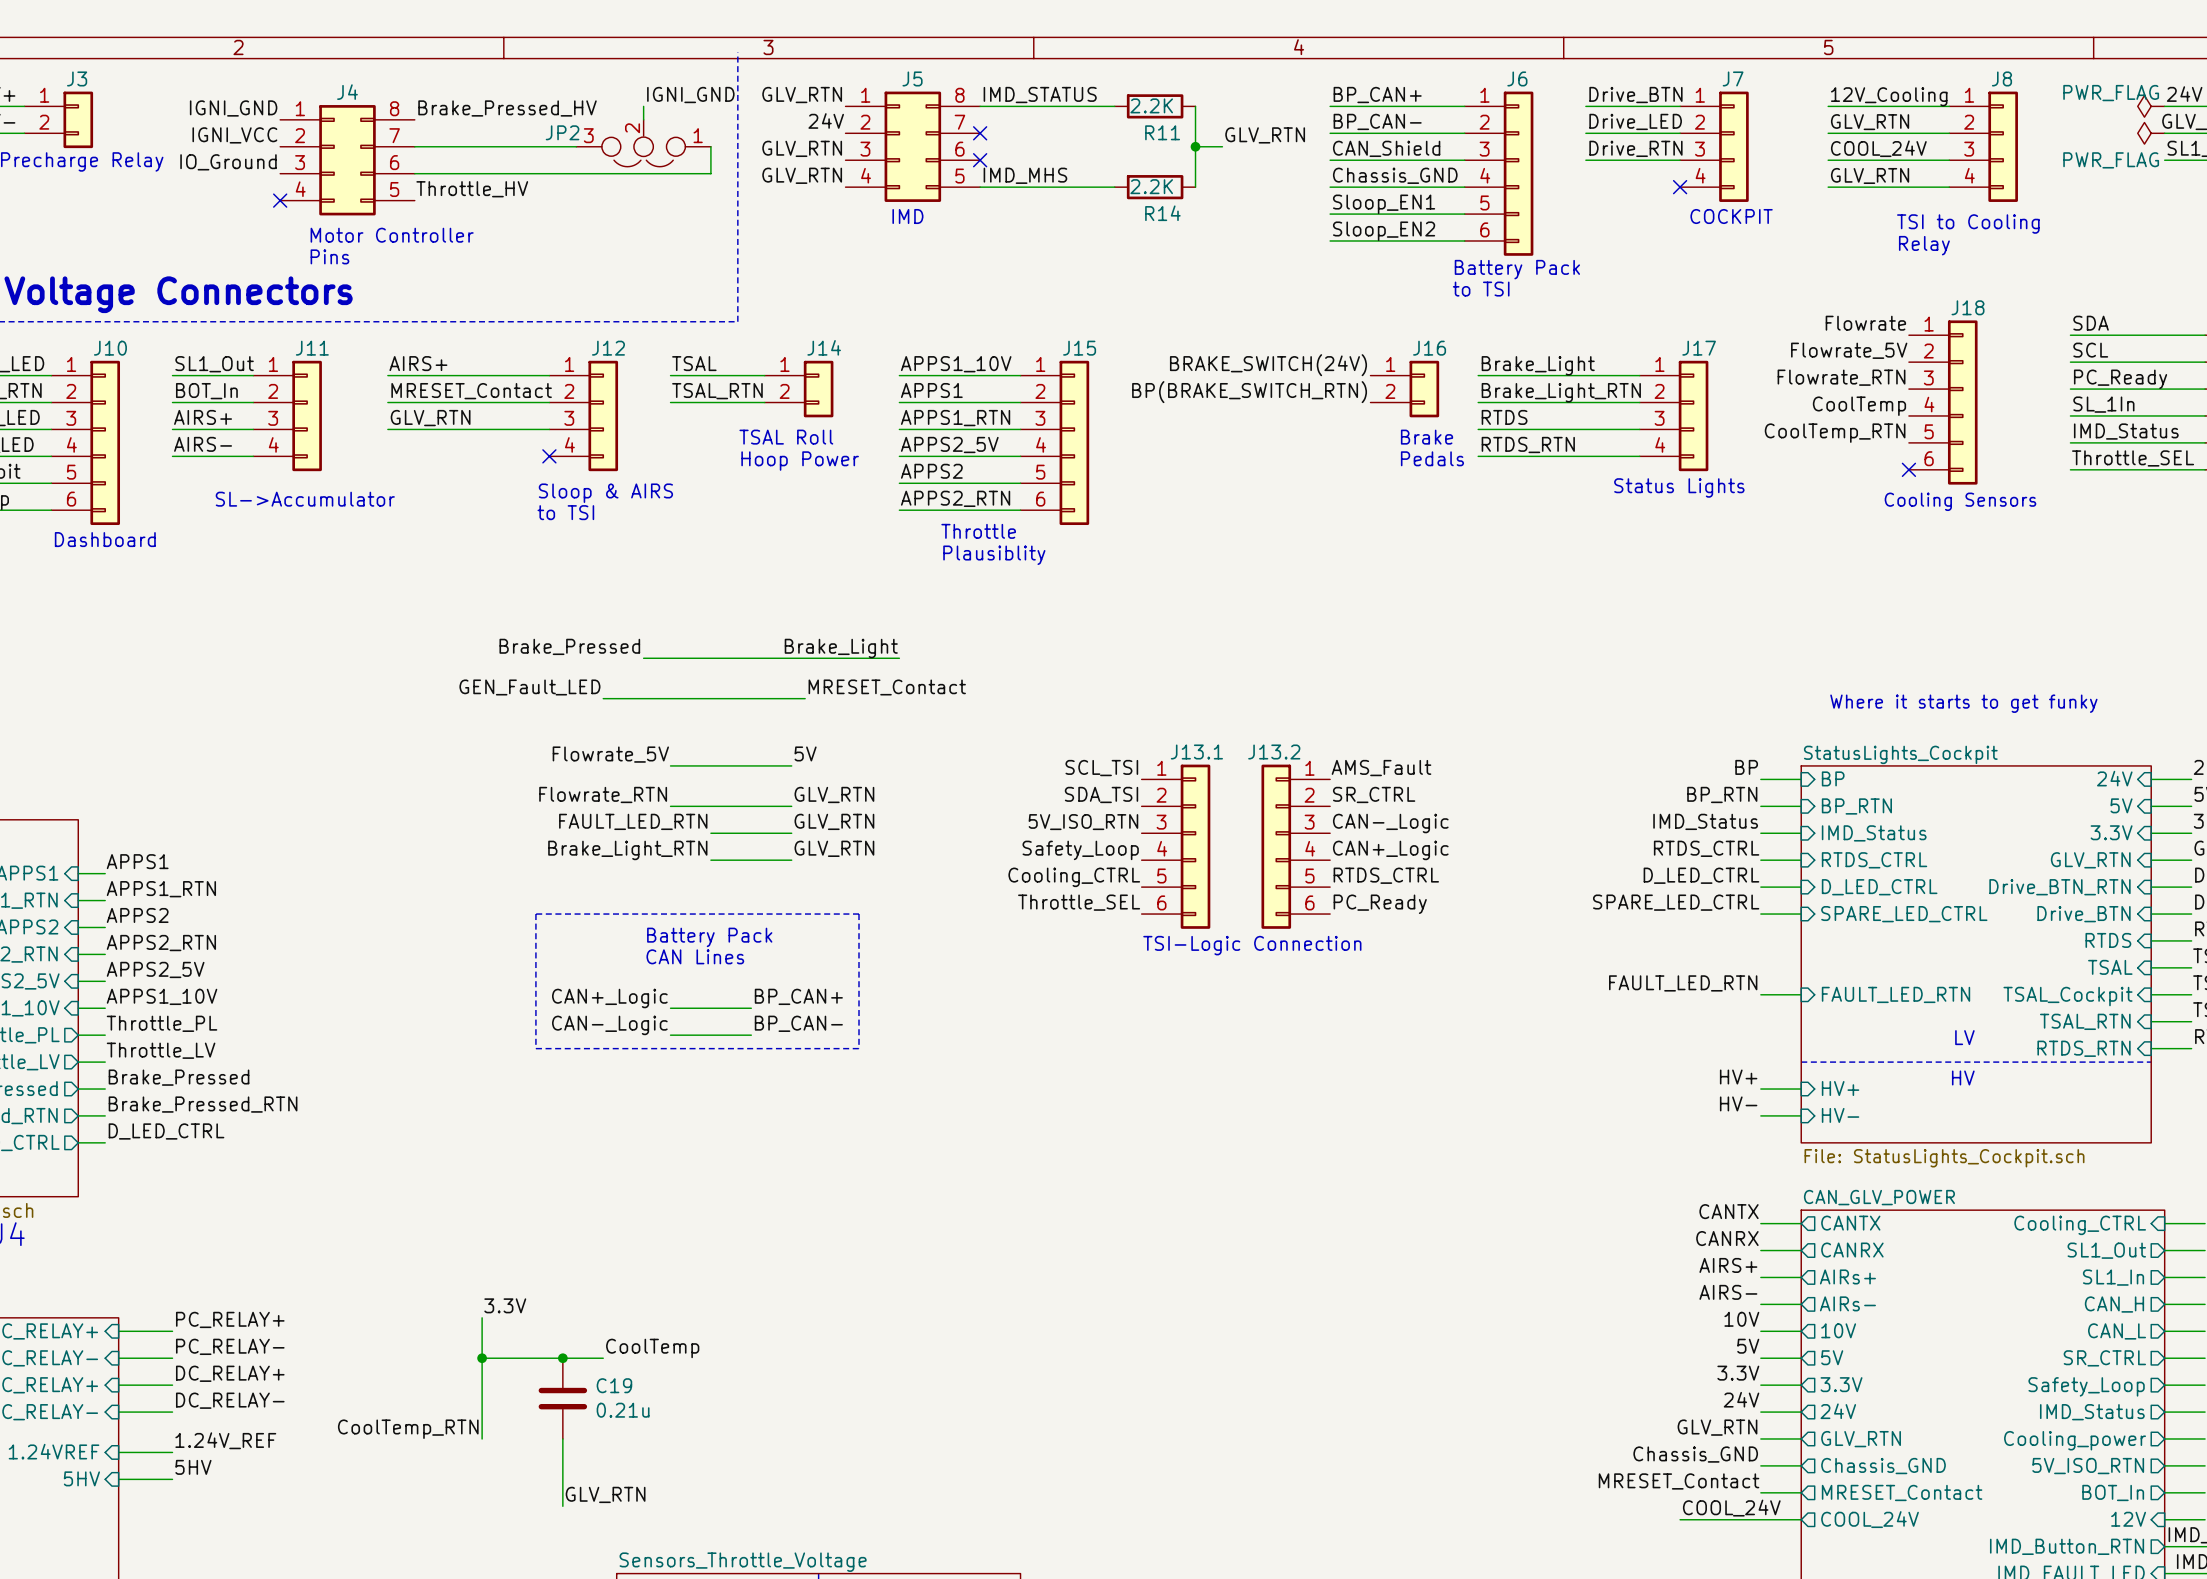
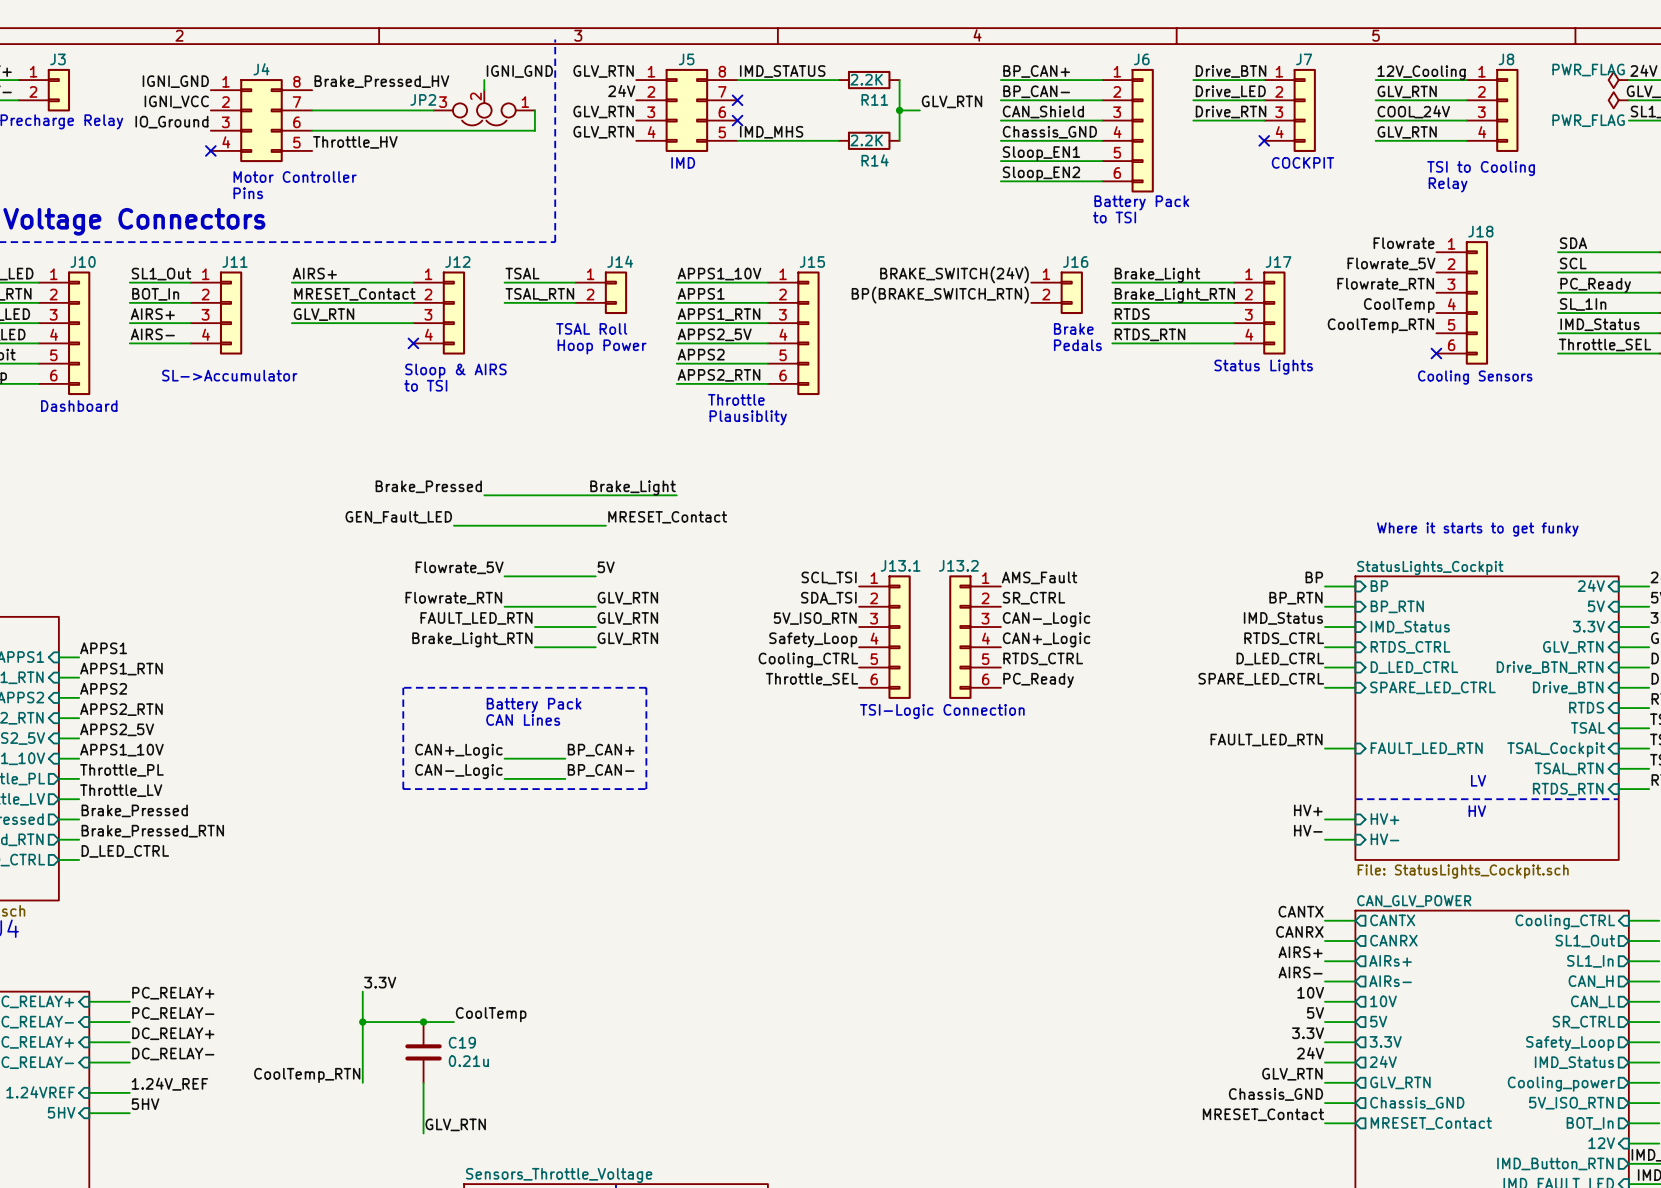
label: COOL_24V (1731, 1508) -> none
wire: (1680, 1519) (1801, 1519) -> none
sheet pin: COOL_24V (1870, 1519) -> none

